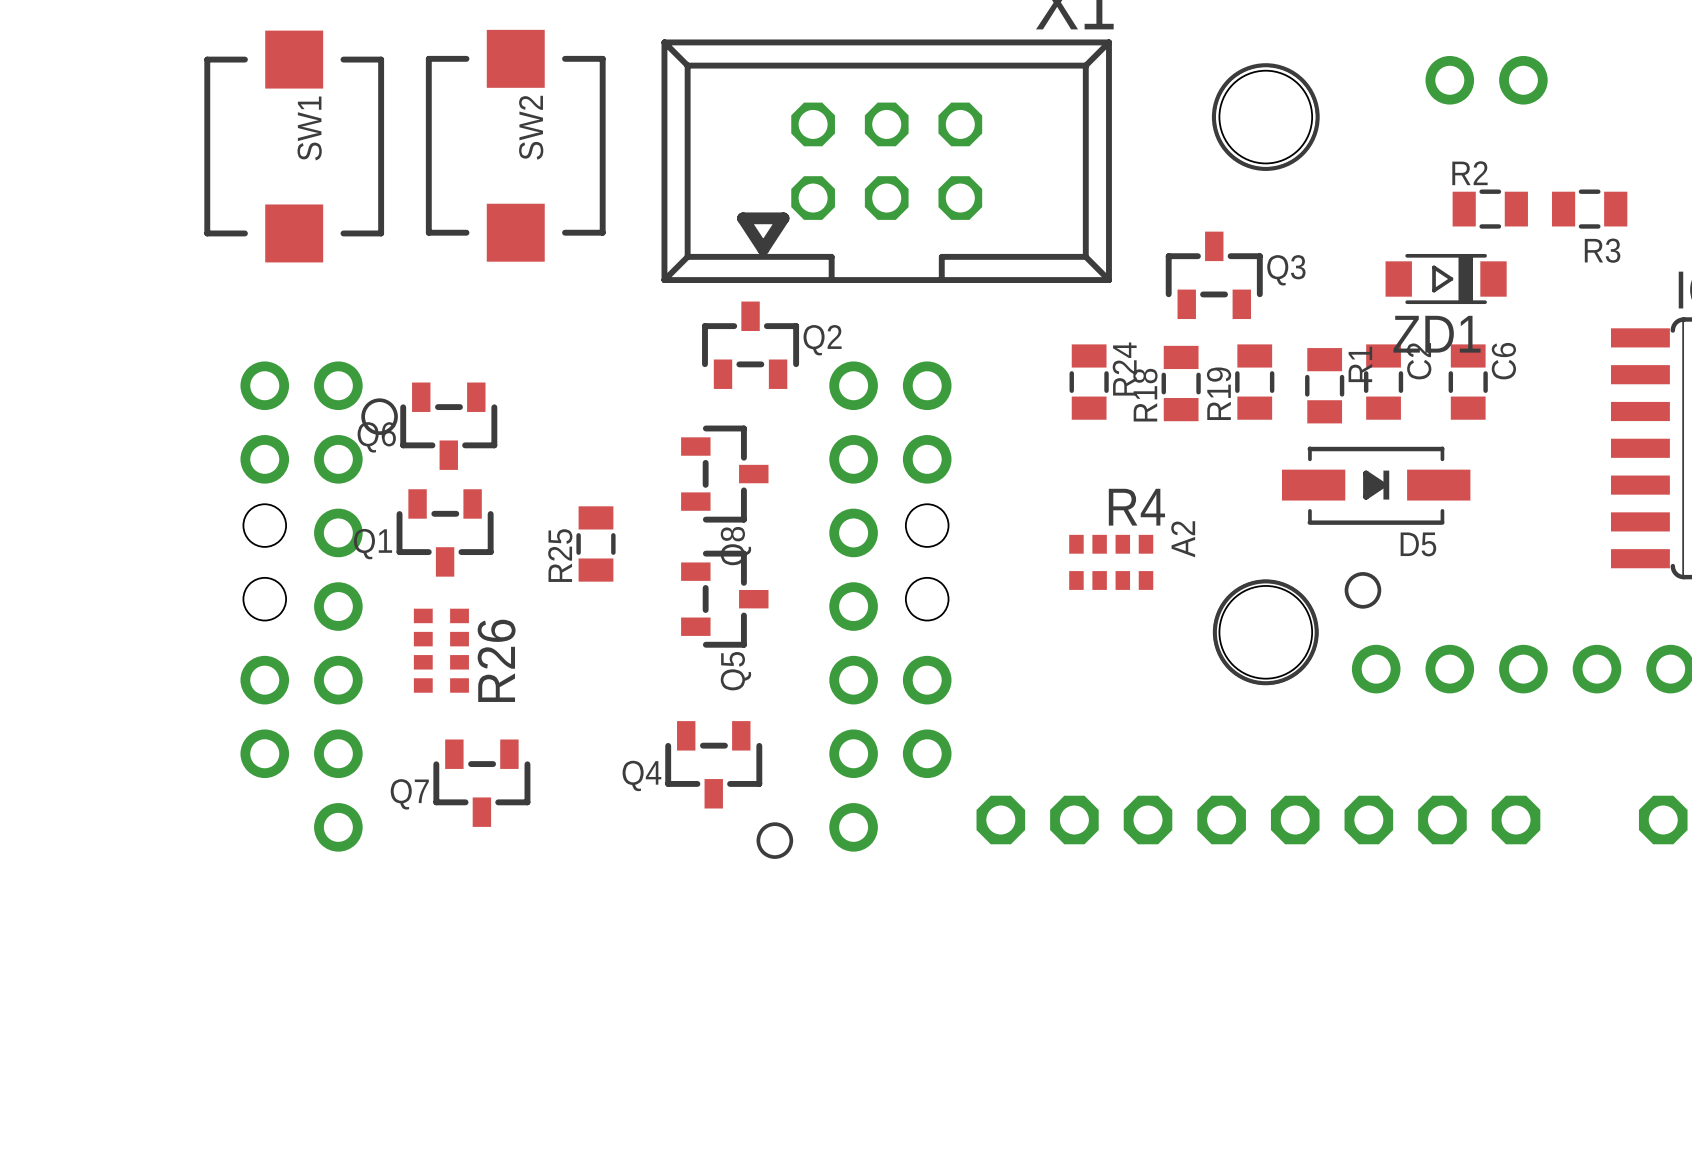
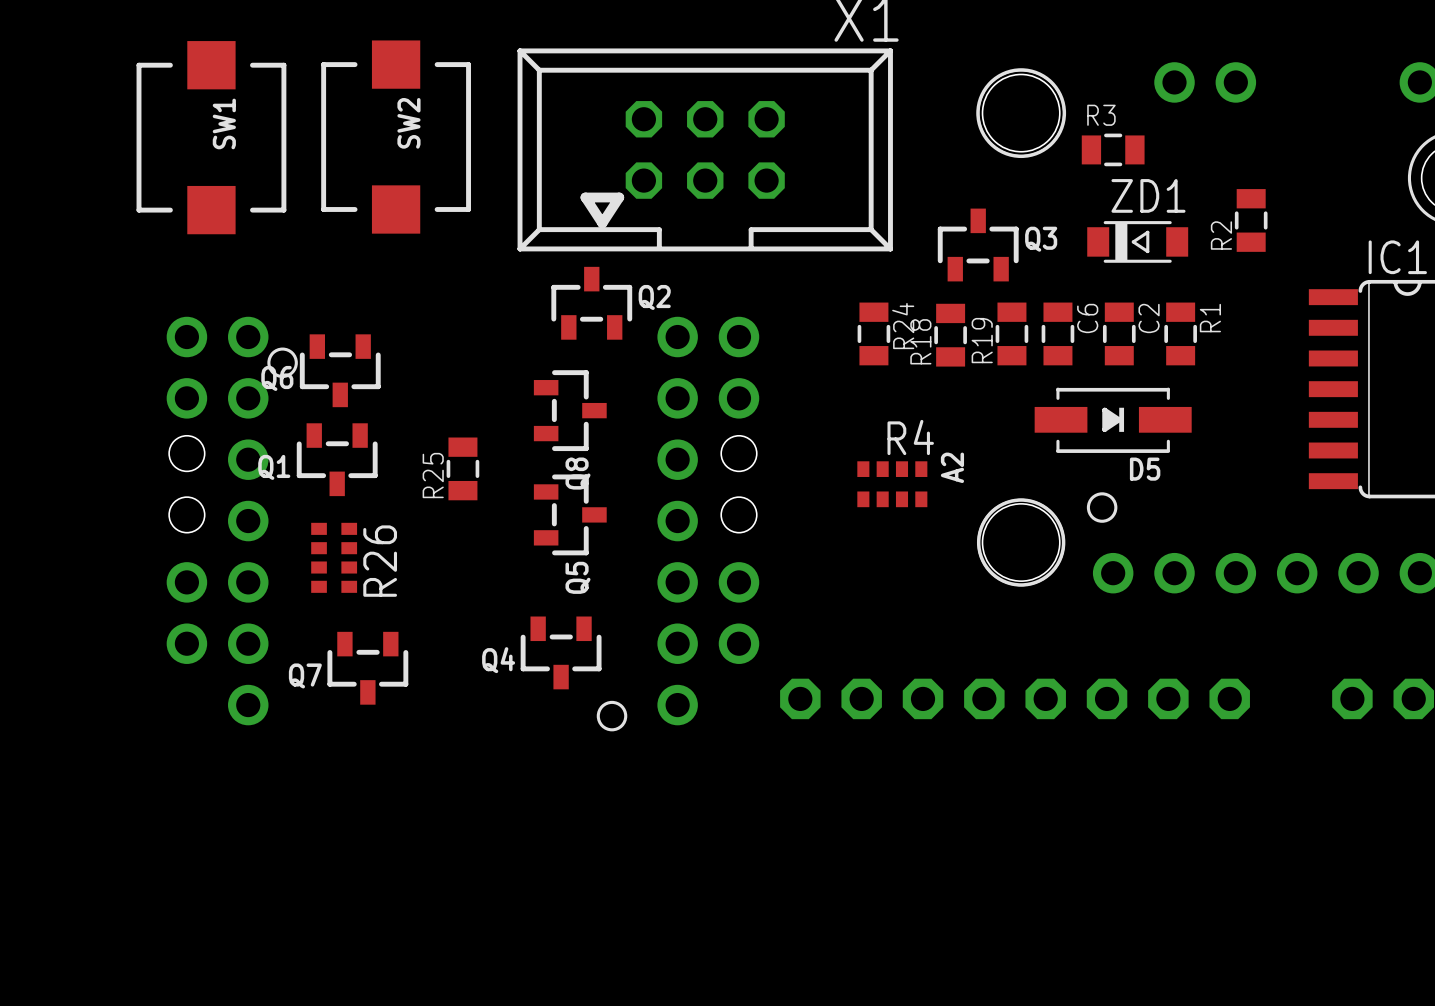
R2 rotation: 0° (1490, 209) -> 90° clockwise (1251, 220)
R2 position: (1490, 209) -> (1251, 220)
R3 position: (1589, 209) -> (1113, 149)
R3 name position: R3 (1602, 250) -> R3 (1101, 115)
ZD1 rotation: 0° (1446, 279) -> 180° (1137, 241)
C6 position: (1468, 382) -> (1057, 333)
R1 position: (1324, 385) -> (1180, 333)

